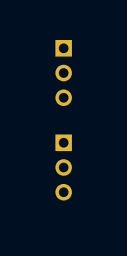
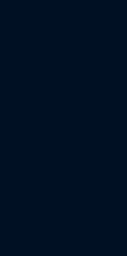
part: (63, 73) -> none
part: (63, 167) -> none

